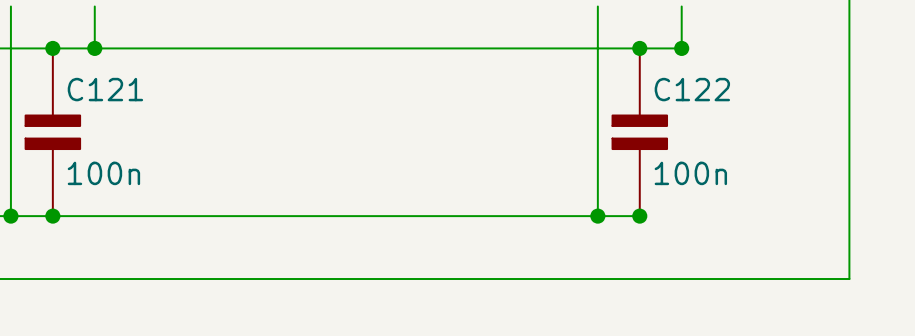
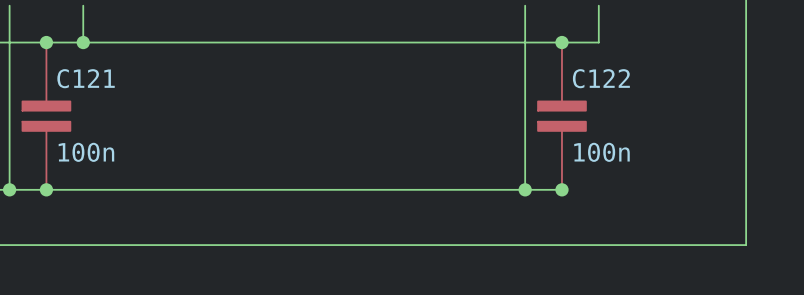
junction: (681, 48) -> none

